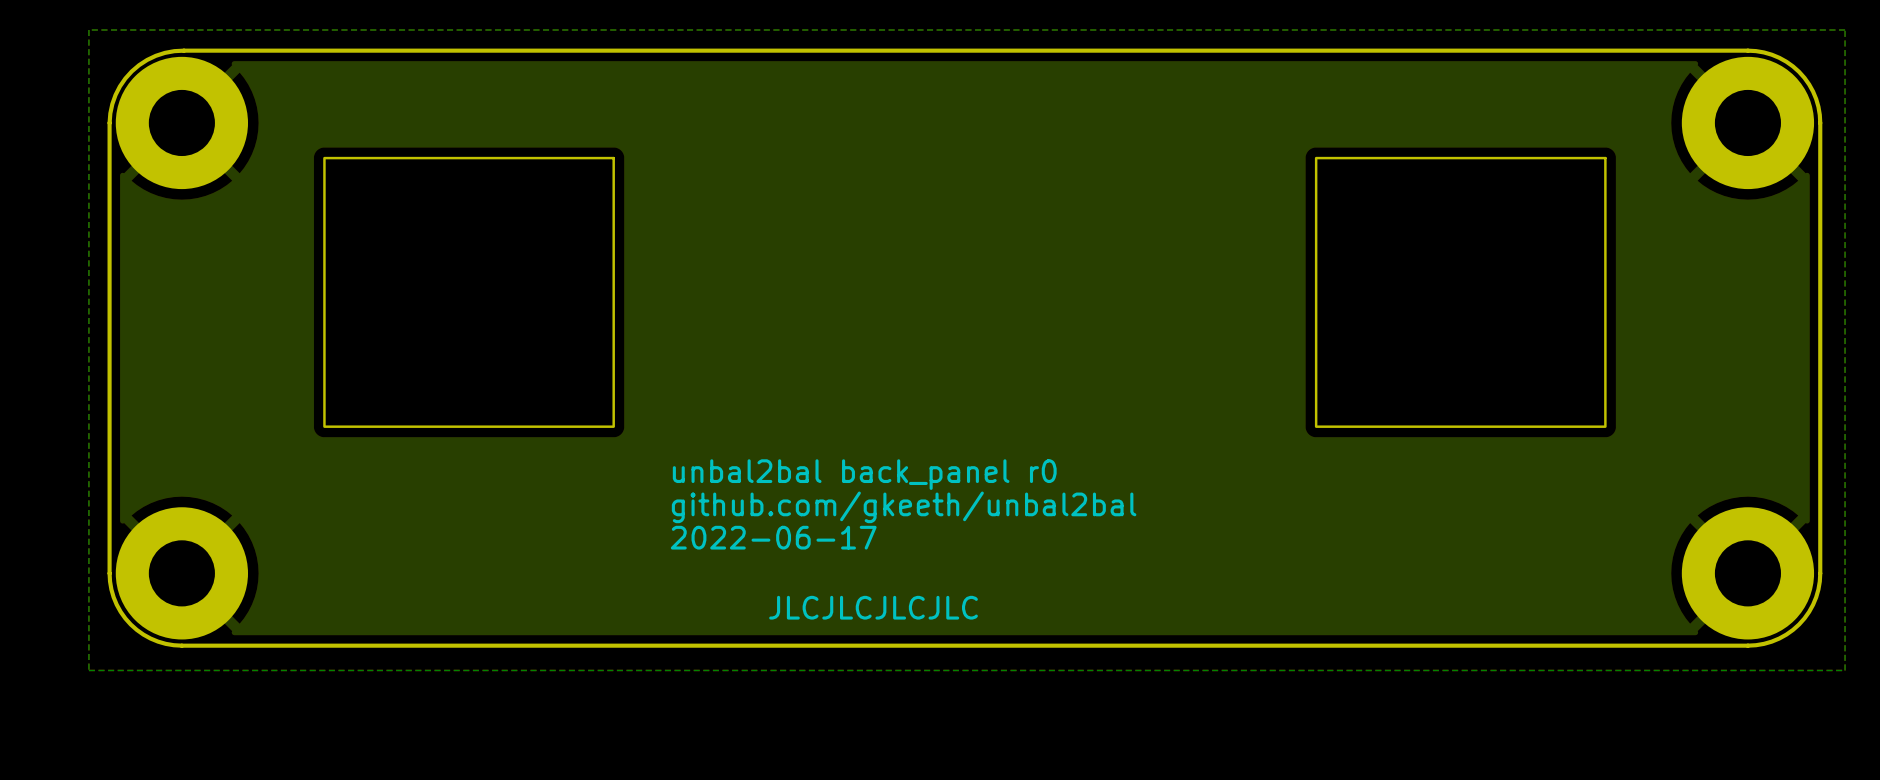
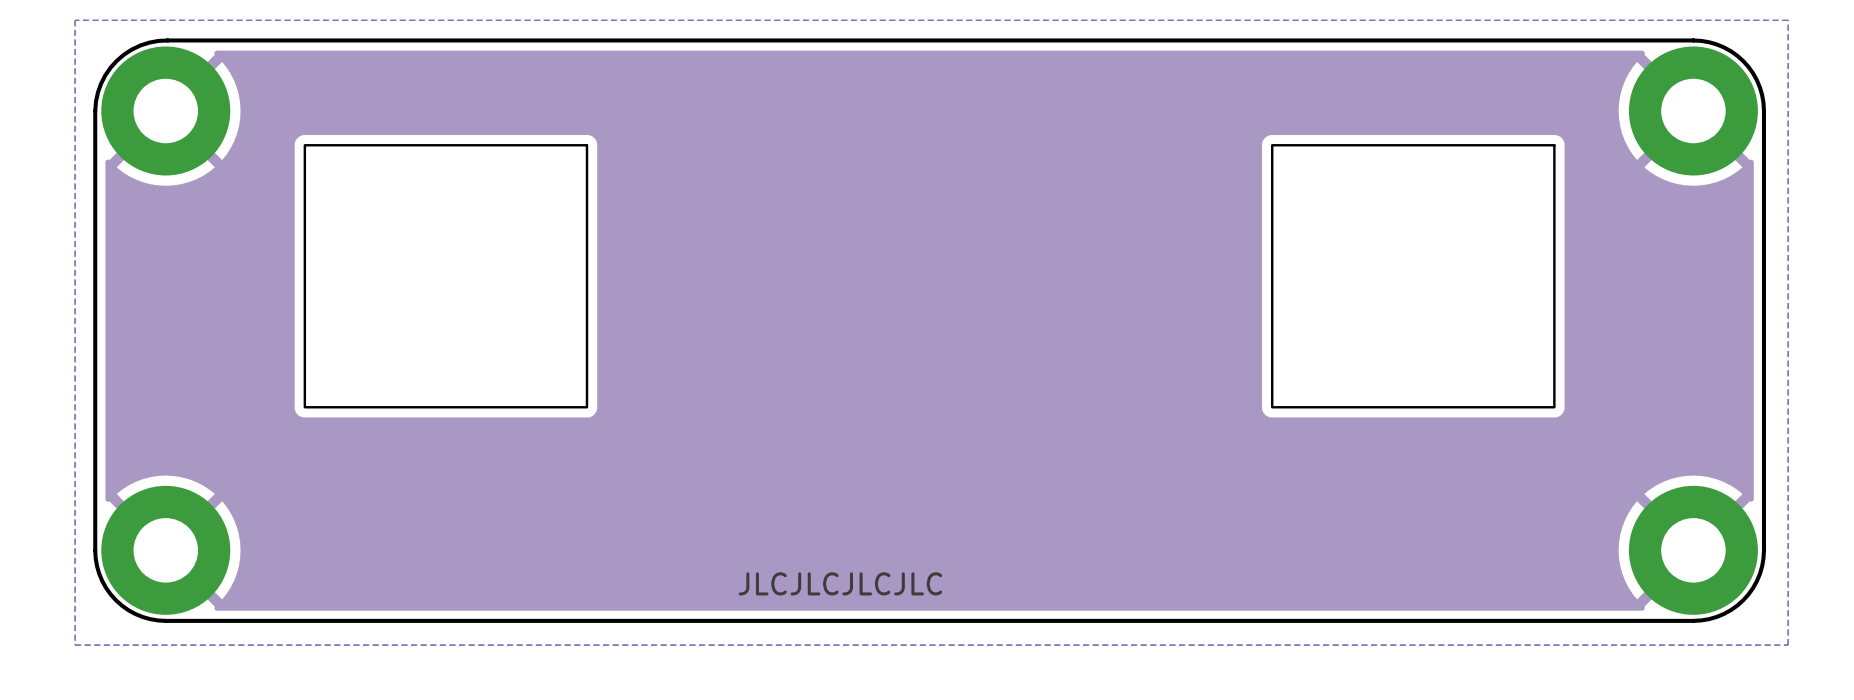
text: unbal2bal back_panel r0 (864, 474) -> none
text: github.com/gkeeth/unbal2bal (904, 507) -> none
text: 2022-06-17 (773, 537) -> none

